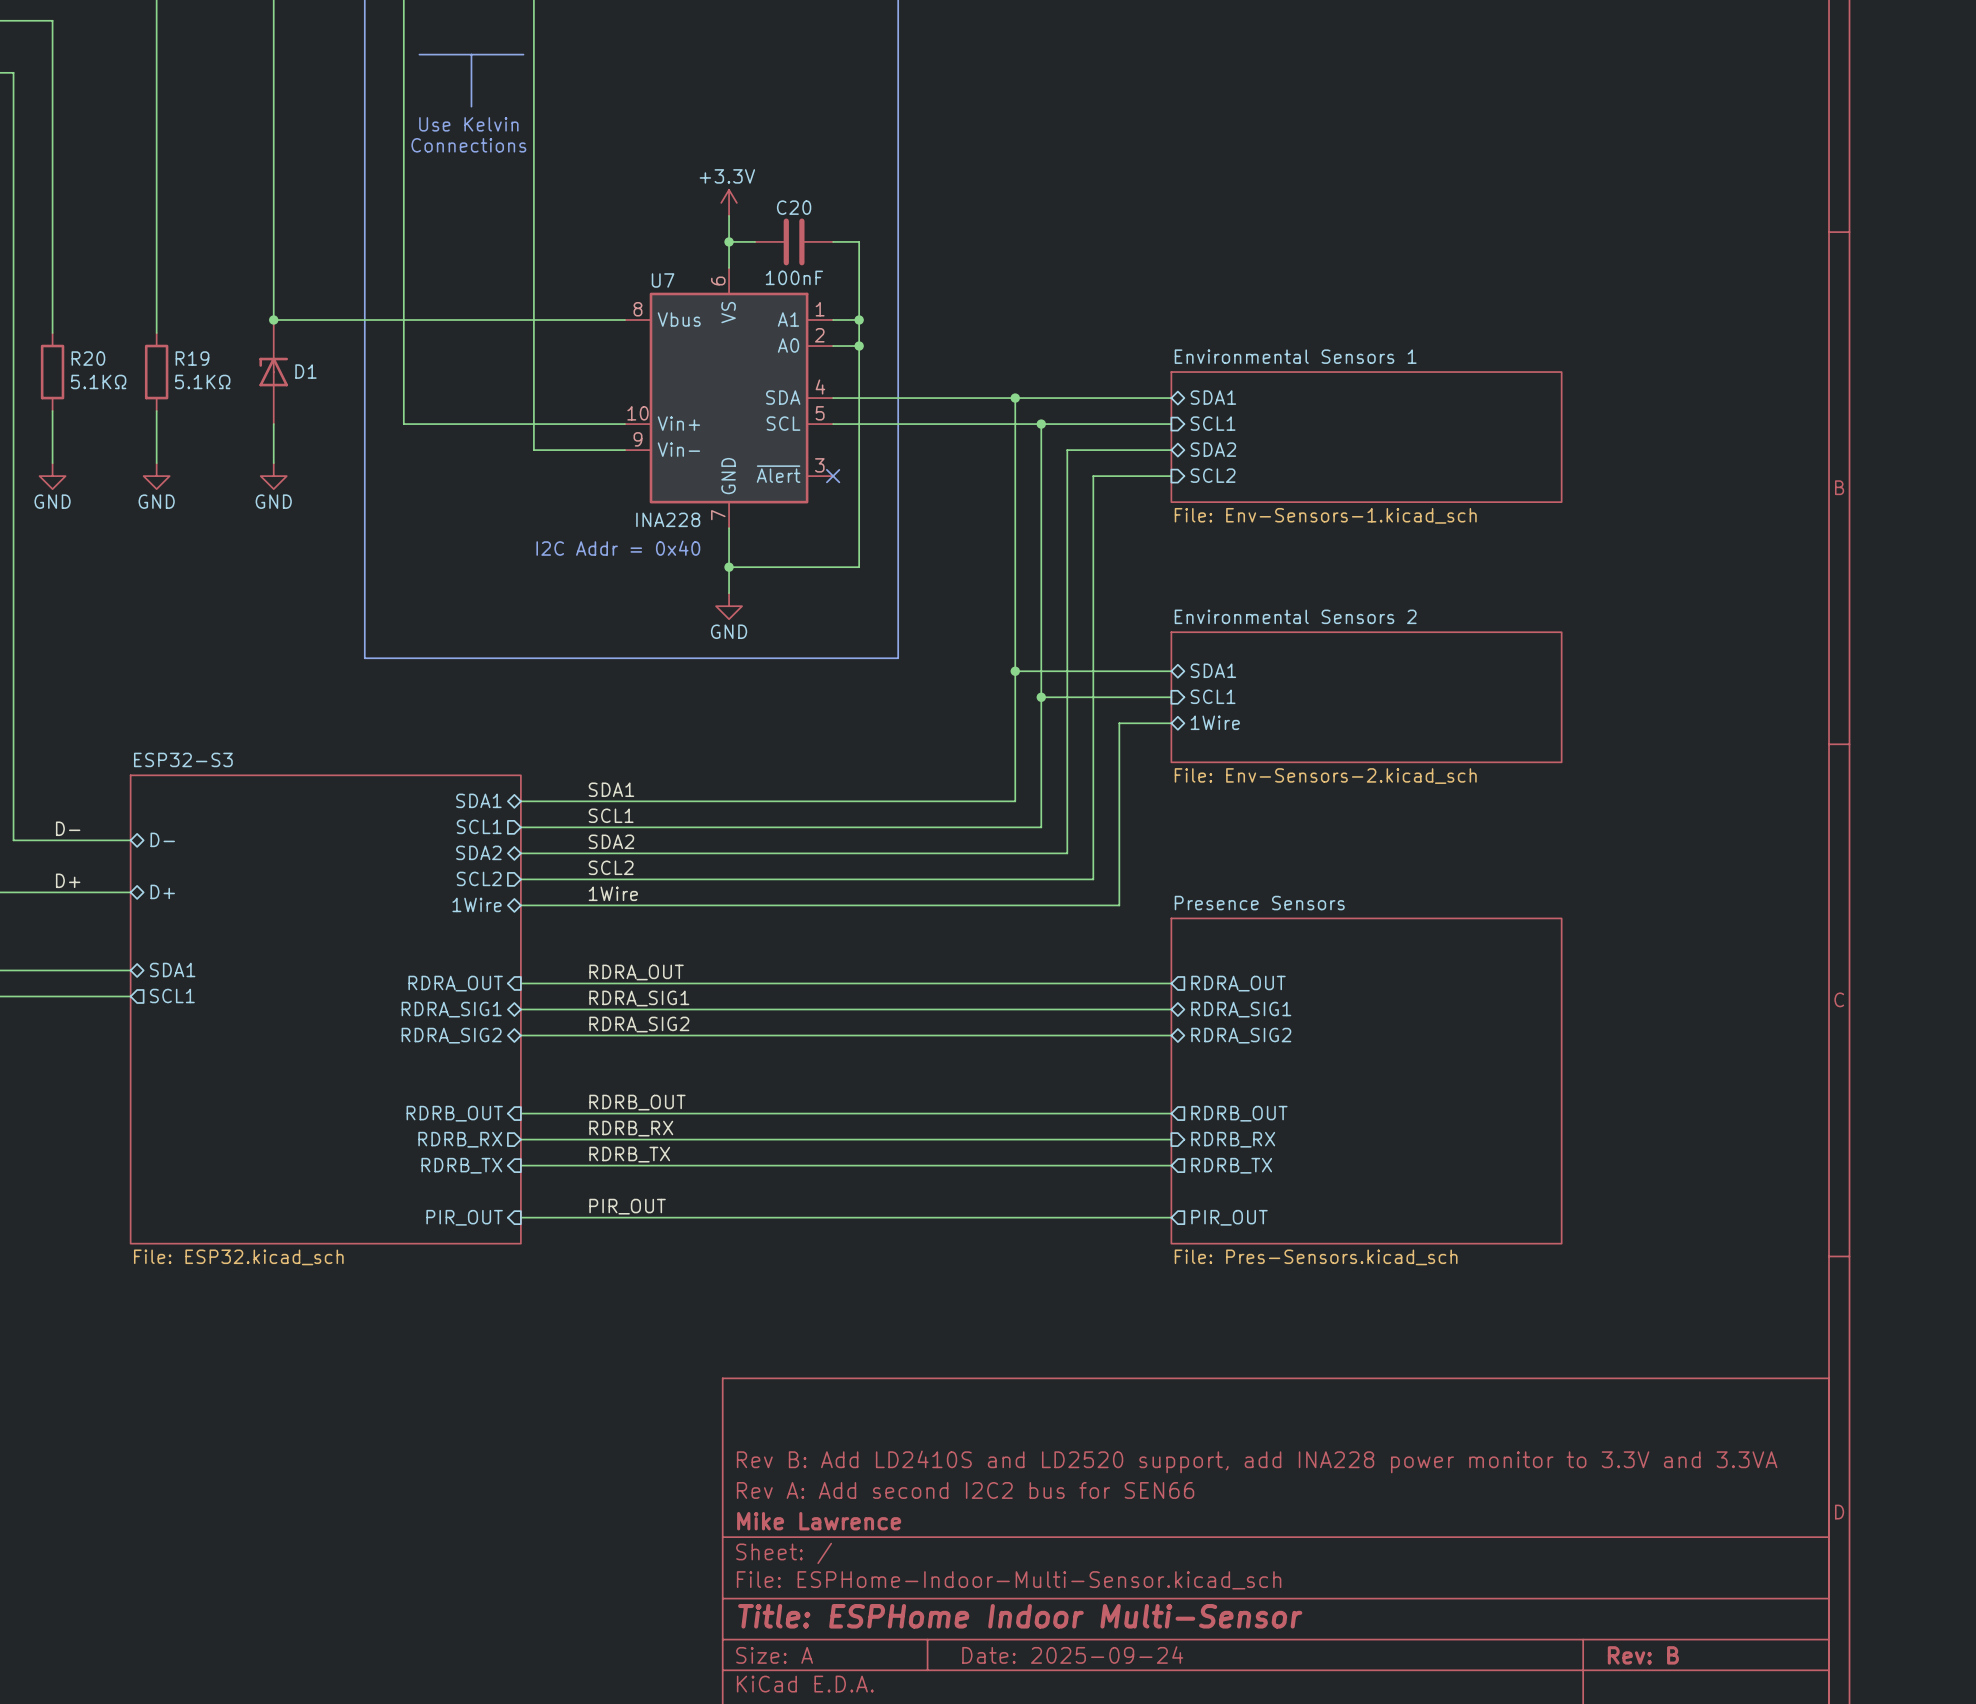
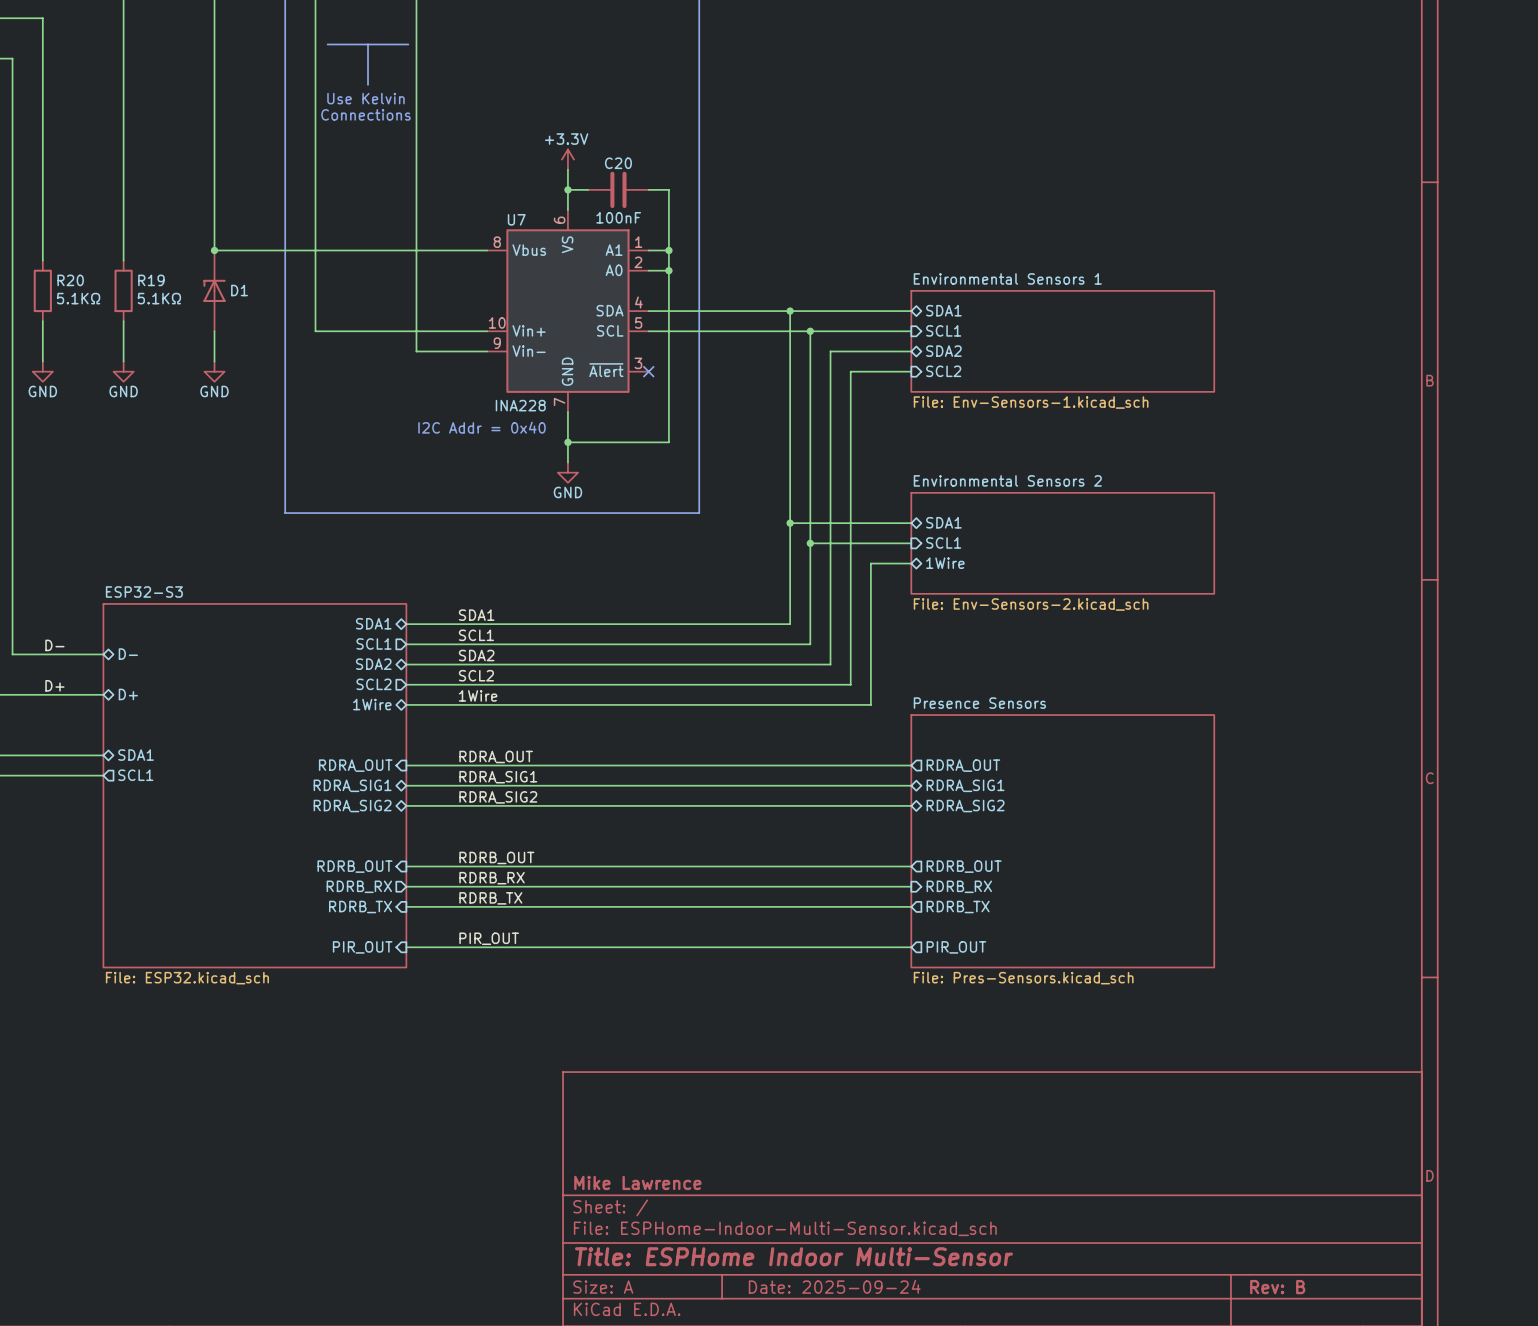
title block: Rev B: Add LD2410S and LD2520 support, add INA228 power monitor to 3.3V and 3.3VA (1257, 1461) -> none
title block: Rev A: Add second I2C2 bus for SEN66 (965, 1490) -> none

